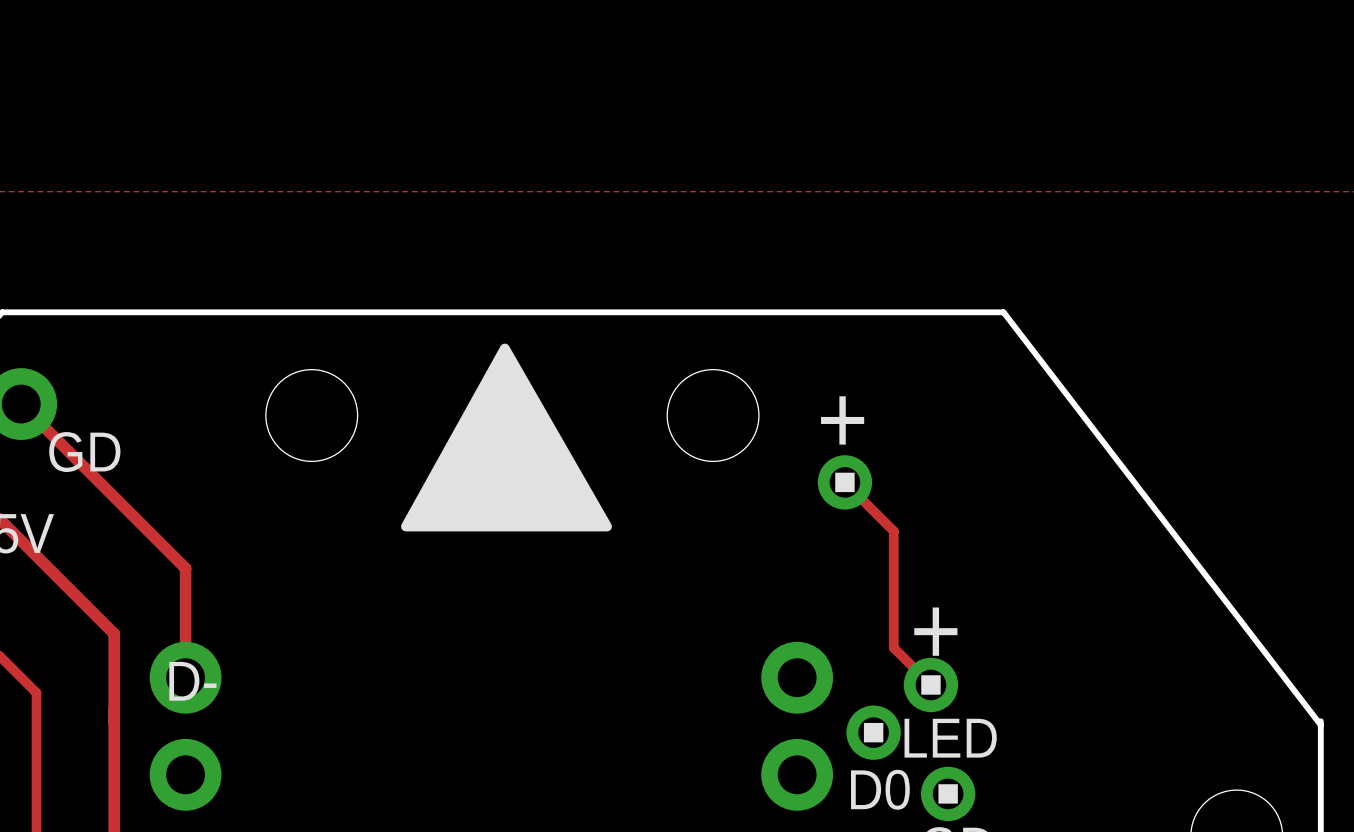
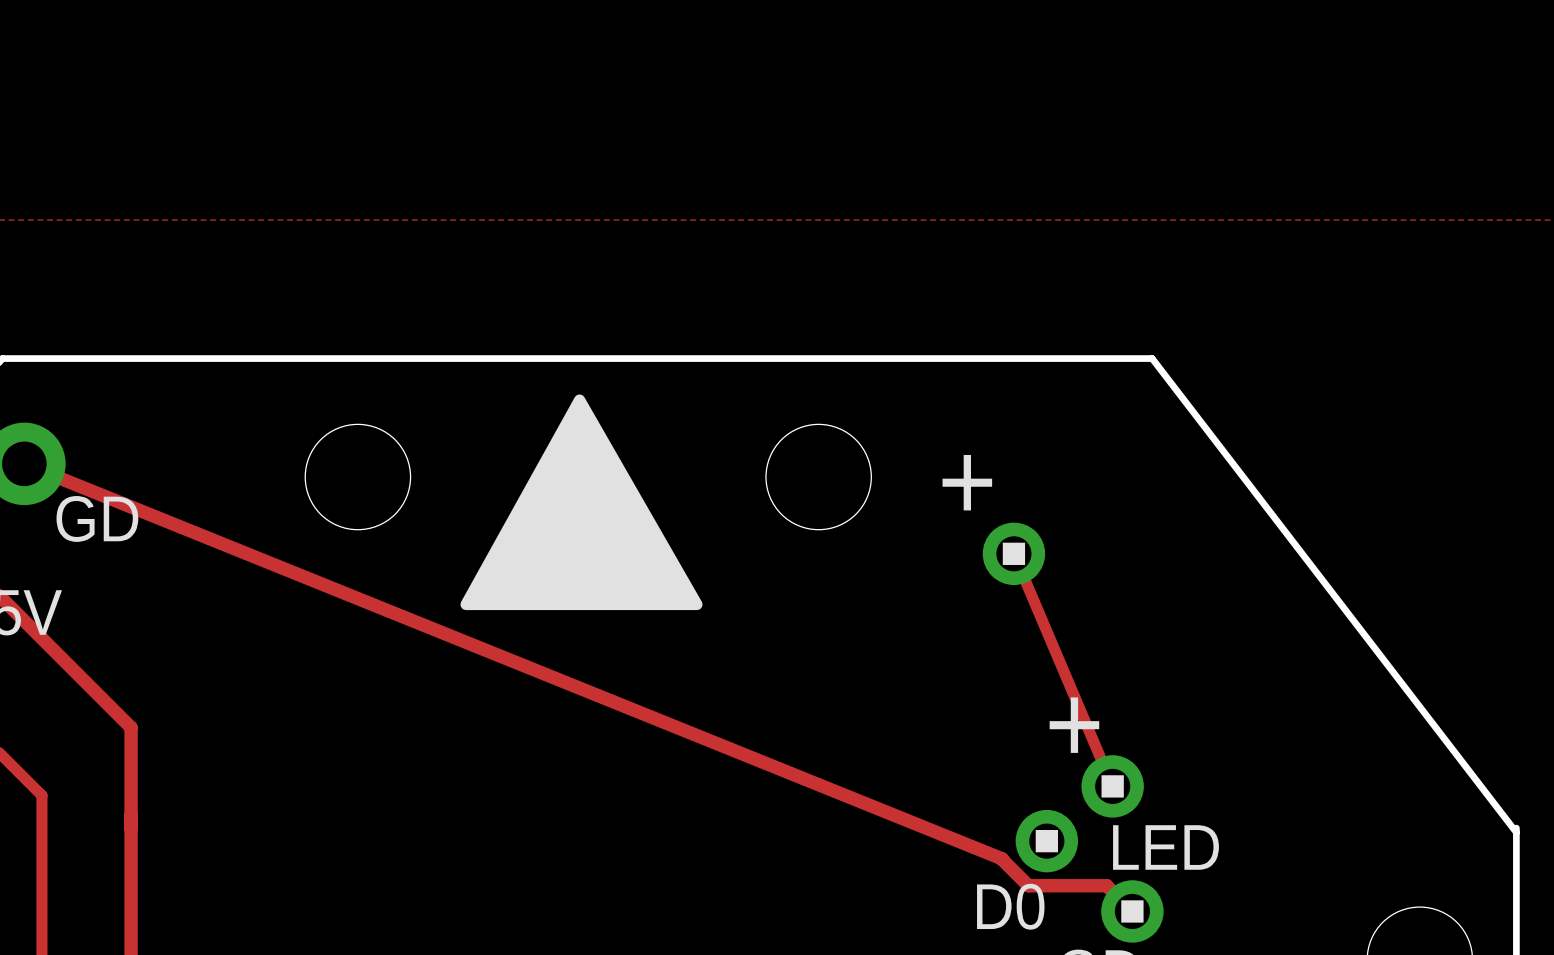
track: (21, 404) (185, 568) (185, 677) -> (24, 463) (1002, 858)
track: (844, 482) (893, 531) (893, 647) (930, 684) -> none
part position: (844, 482) -> (1013, 553)
track: none -> (1013, 553) (1112, 786)
text: D- (192, 681) -> none
part: (930, 684) -> none
part: none -> (1112, 786)
part: (185, 726) -> none
part: (797, 726) -> none
part: (873, 732) -> none
part: none -> (1046, 841)
text position: LED (950, 738) -> LED (1166, 847)
track: none -> (1002, 859) (1028, 885) (1106, 885) (1132, 911)
part: (948, 793) -> none
part: none -> (1132, 911)

